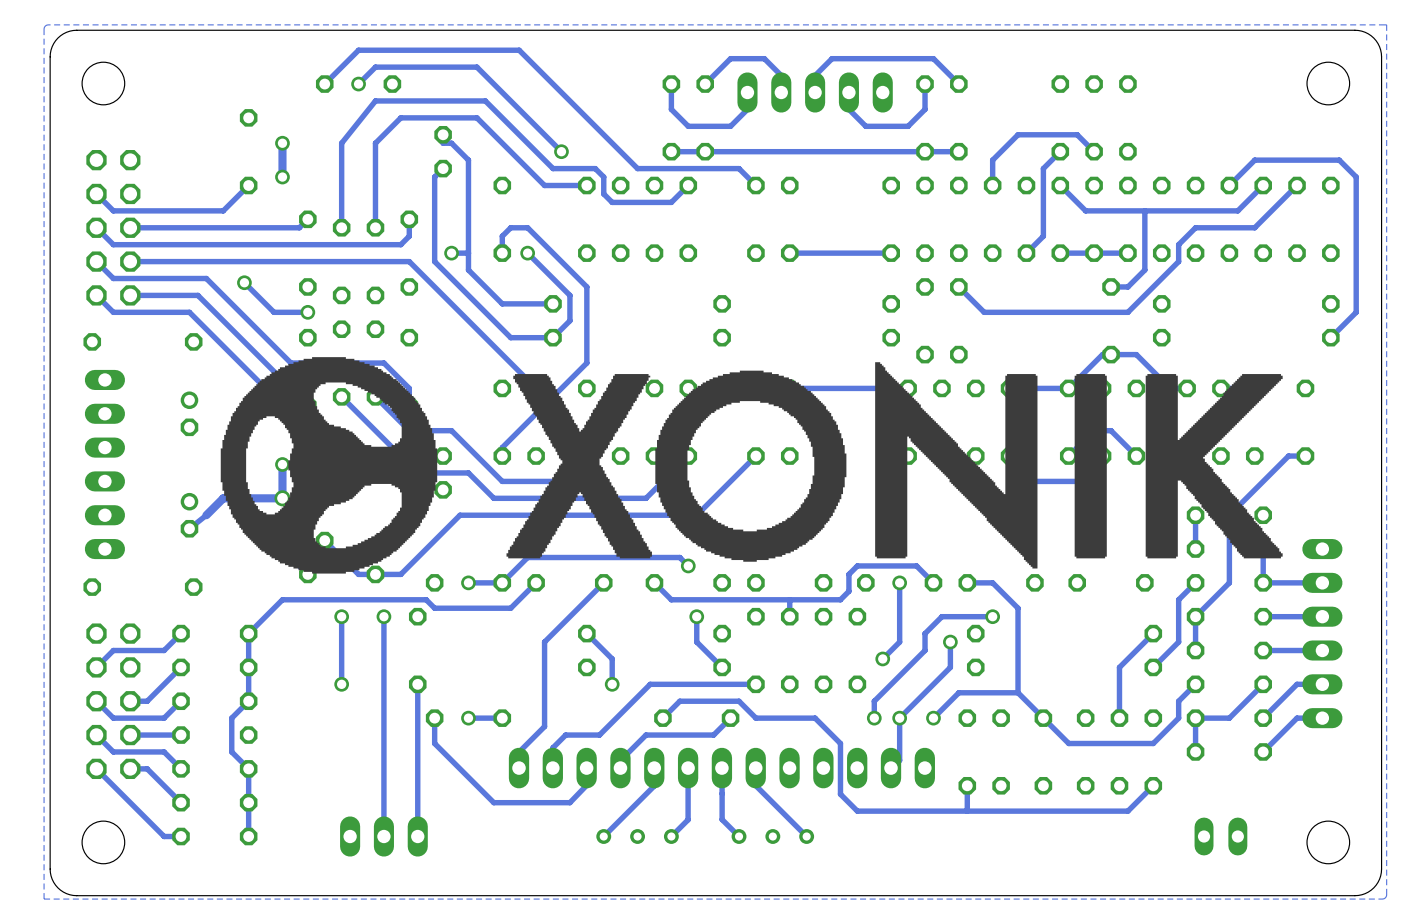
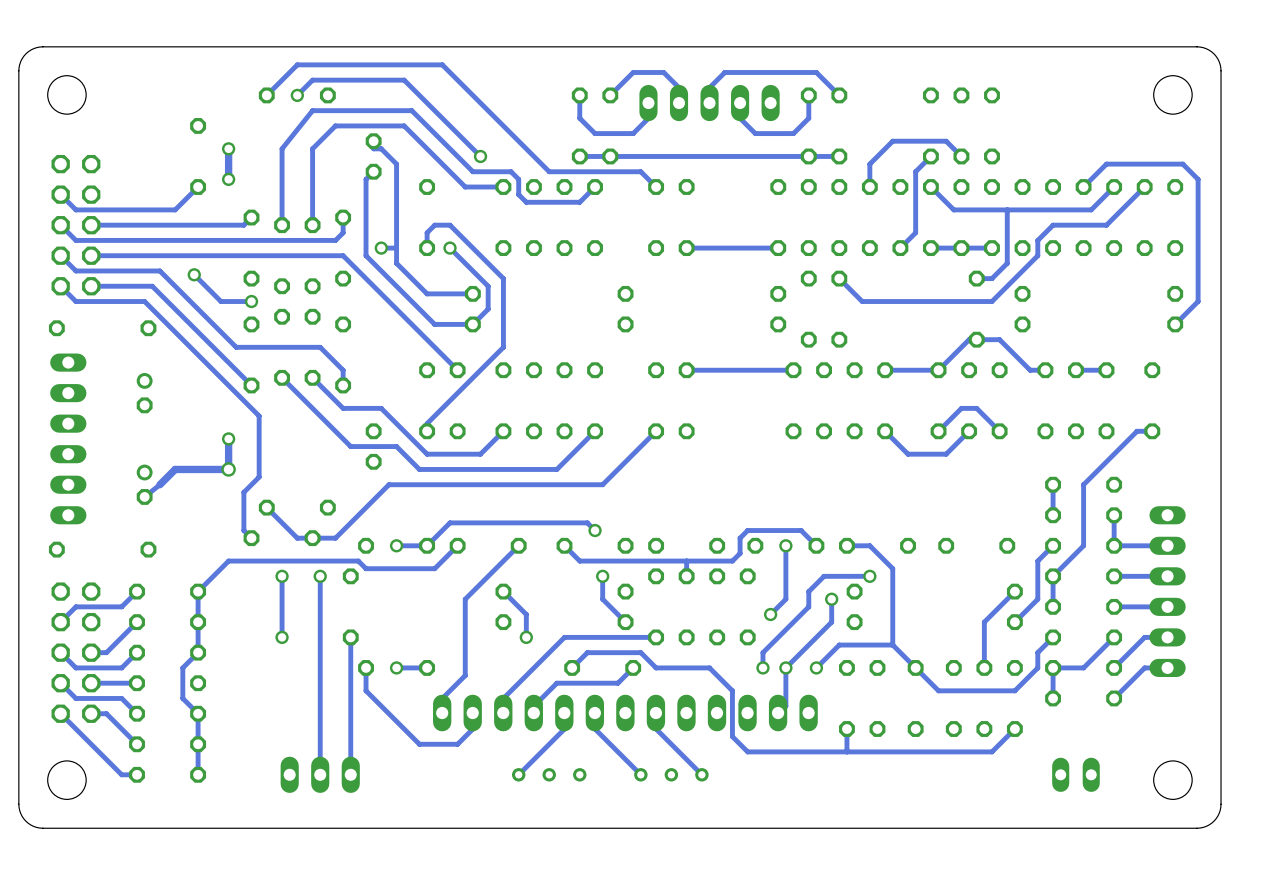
zone outline: (1386, 24) (46, 25) (44, 29) (44, 899) (1384, 898) (1386, 894) (1386, 24) -> none
drawing: [220, 357, 438, 574] -> none
drawing: [875, 362, 1038, 569] -> none
drawing: [655, 370, 847, 562] -> none
drawing: [506, 374, 652, 559] -> none
drawing: [1074, 374, 1107, 559] -> none
drawing: [1145, 374, 1283, 559] -> none
track: (654, 684) (650, 684) (599, 735) (565, 735) (553, 747) (552, 768) -> (564, 637) (503, 698) (503, 713)
track: (586, 768) (586, 785) (569, 802) (536, 802) -> (472, 713) (472, 729) (457, 744)
track: (688, 768) (688, 819) (671, 836) -> none
track: (721, 768) (722, 819) -> (594, 713) (595, 729) (625, 759)

